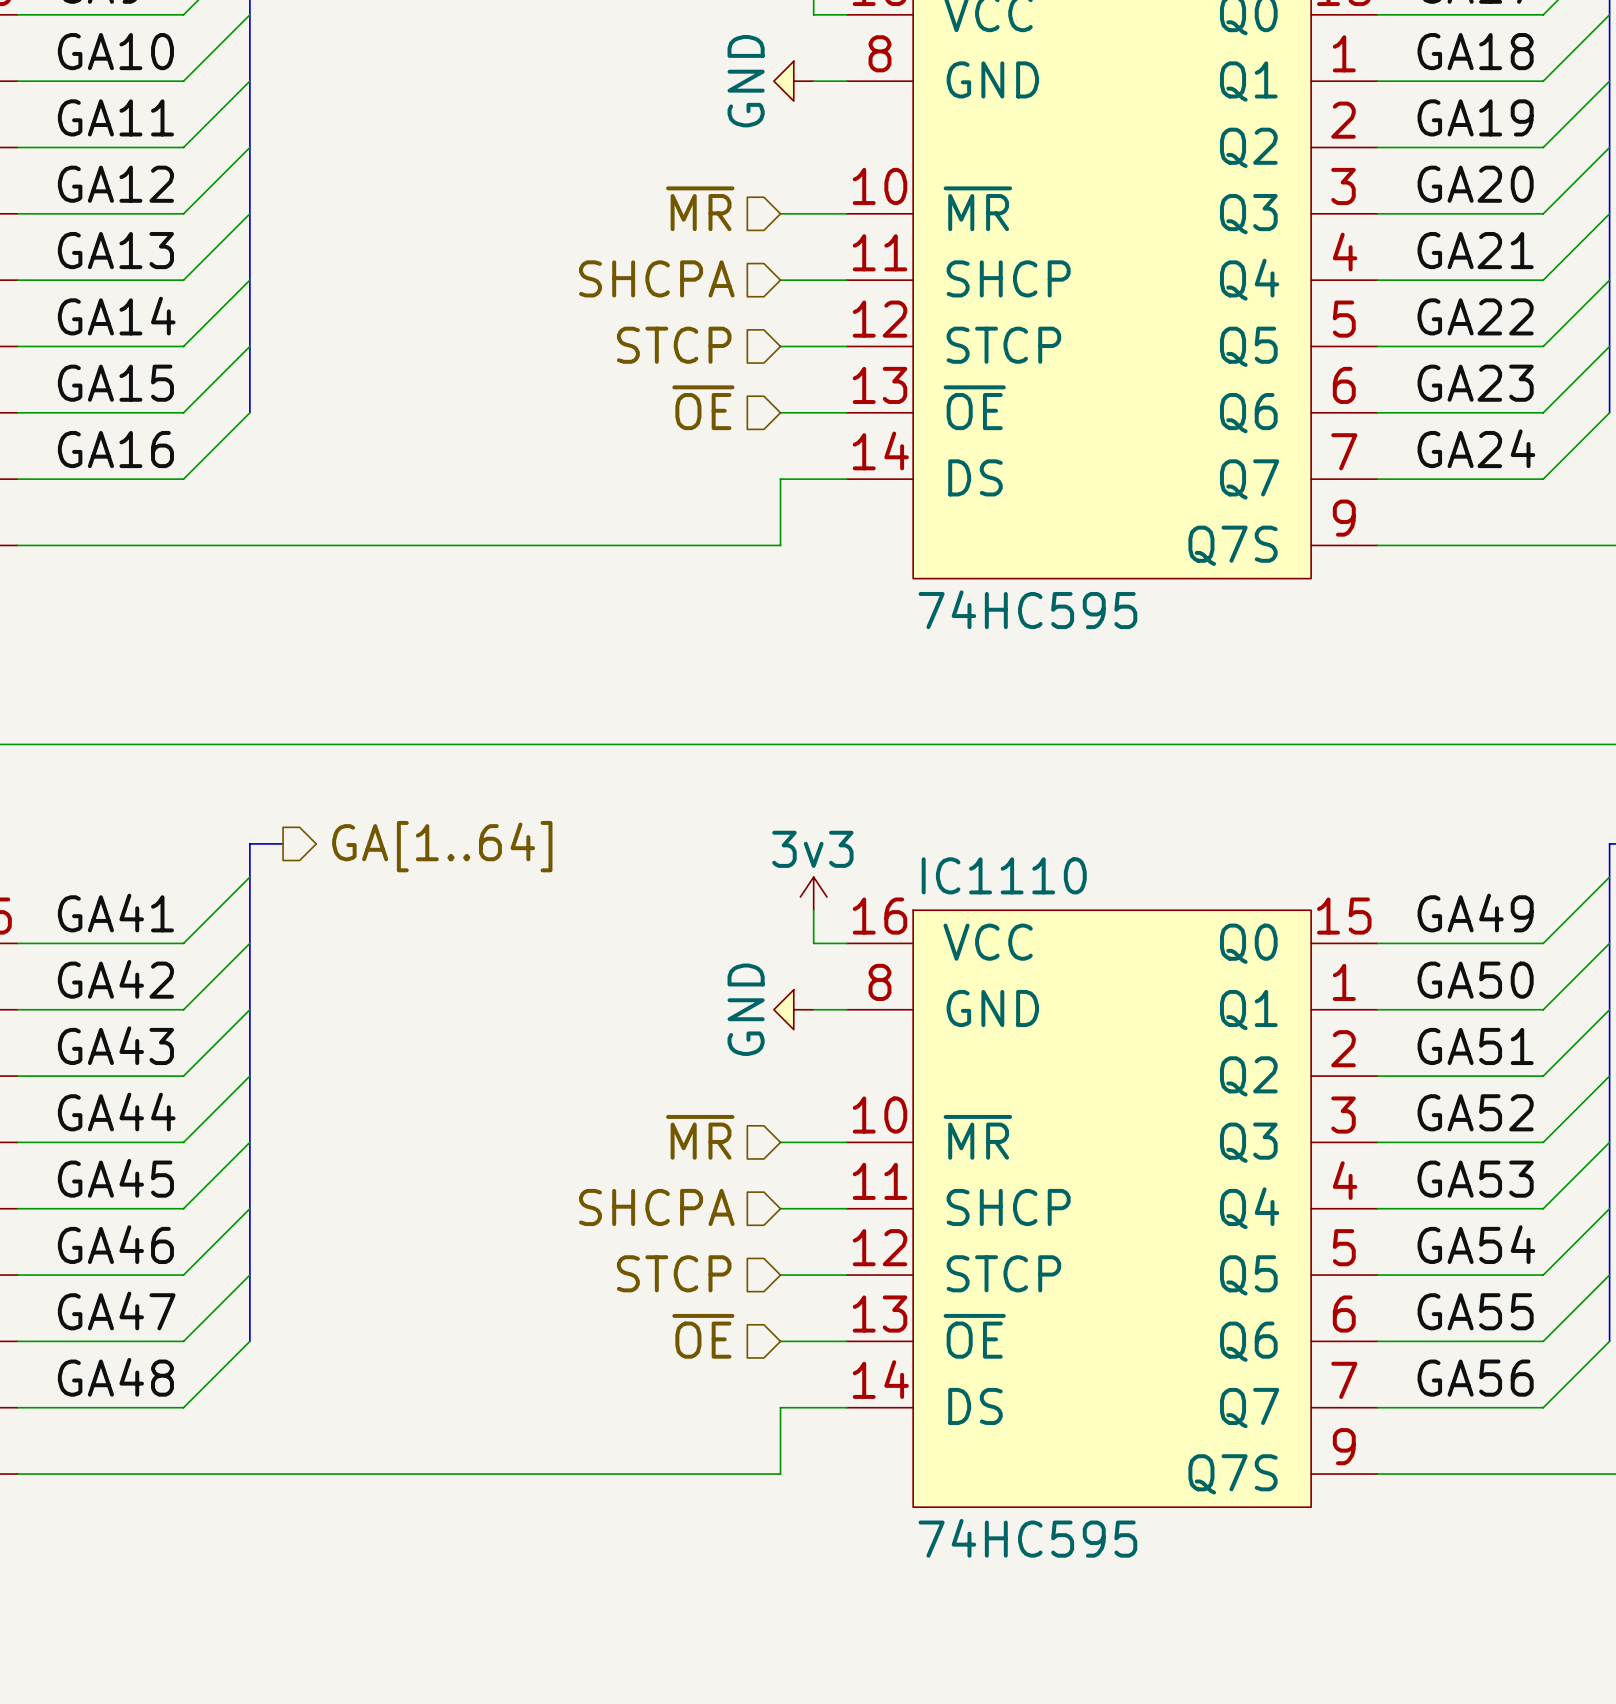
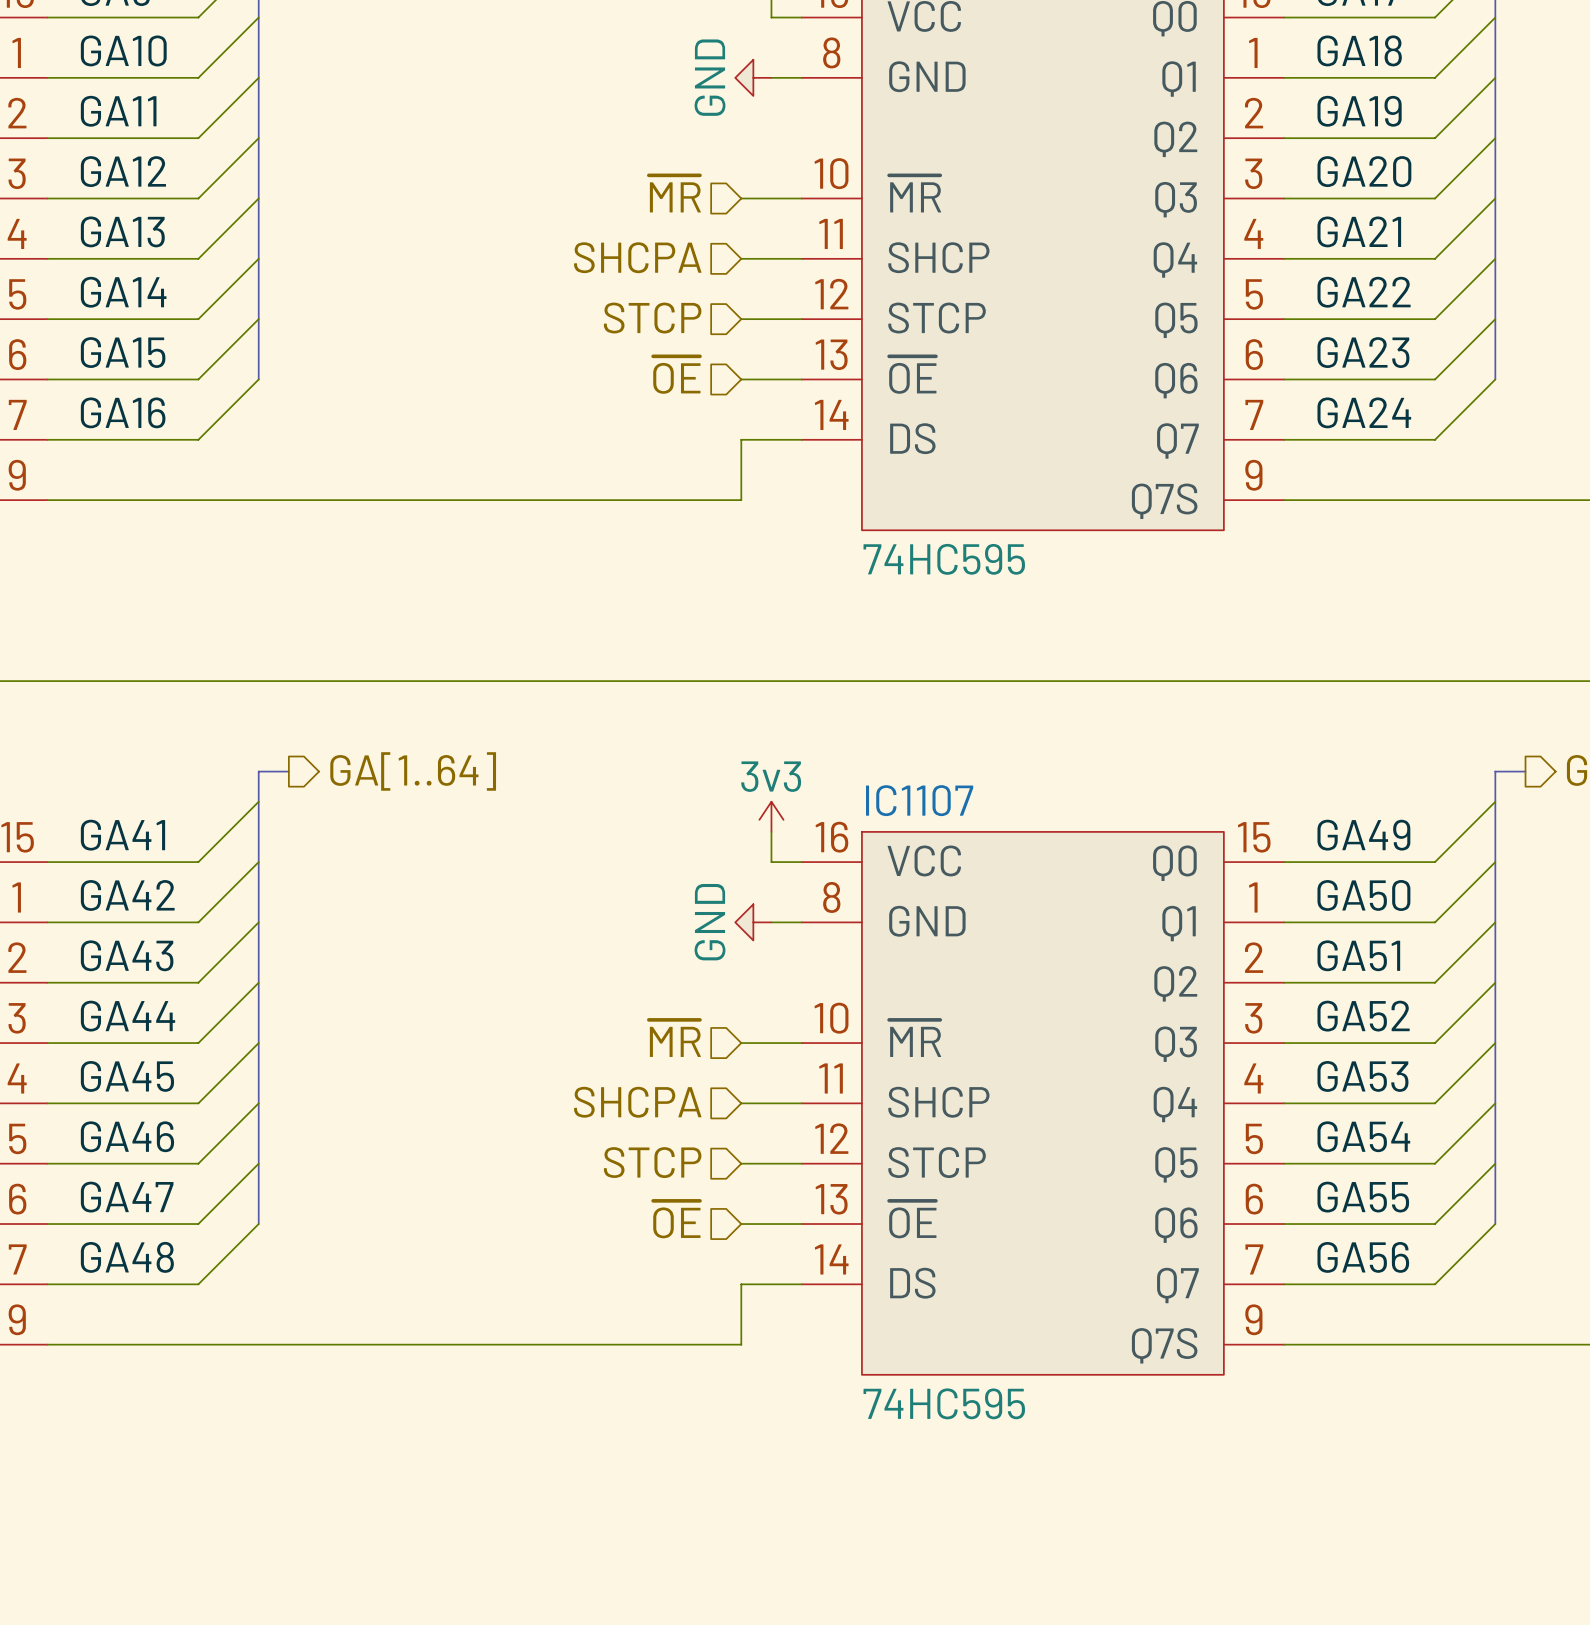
IC1110 name: IC1110 (1004, 875) -> IC1107 (919, 800)

